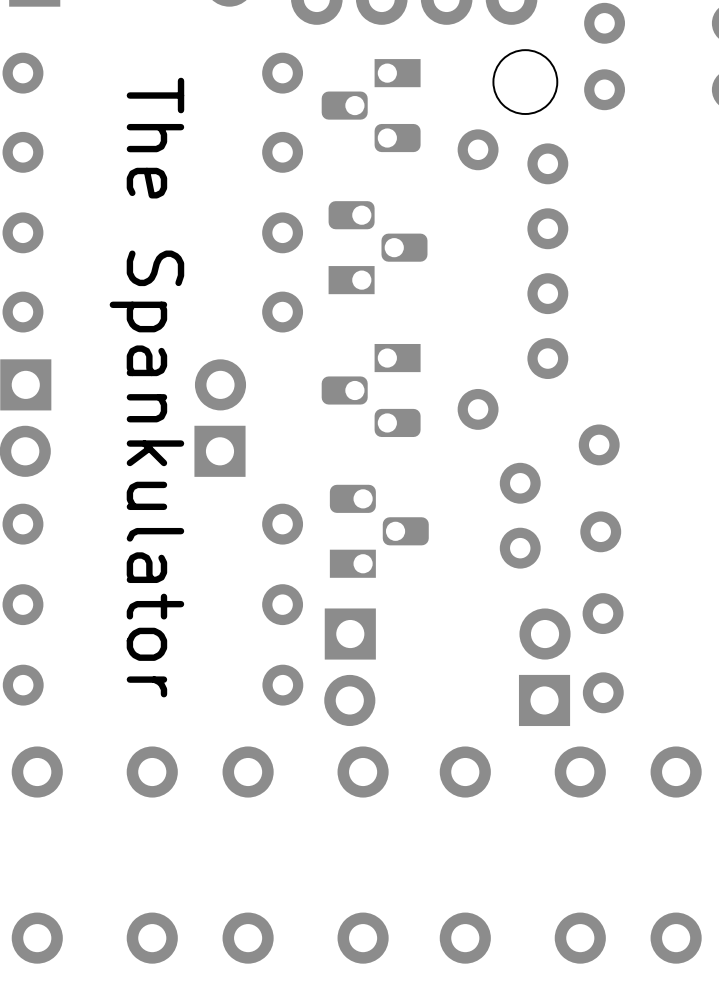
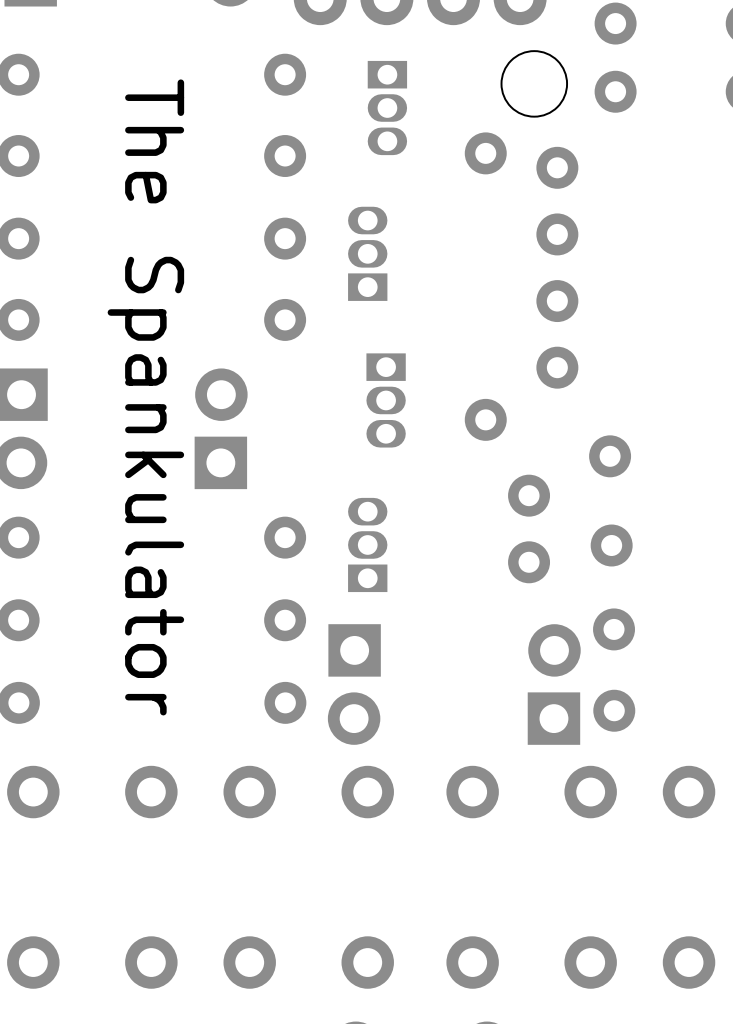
part footprint: [321, 59, 421, 153] -> [367, 60, 408, 156]
part footprint: [328, 201, 428, 295] -> [348, 206, 388, 301]
part footprint: [321, 343, 421, 438] -> [366, 353, 406, 448]
part footprint: [329, 484, 429, 578] -> [348, 497, 388, 593]

